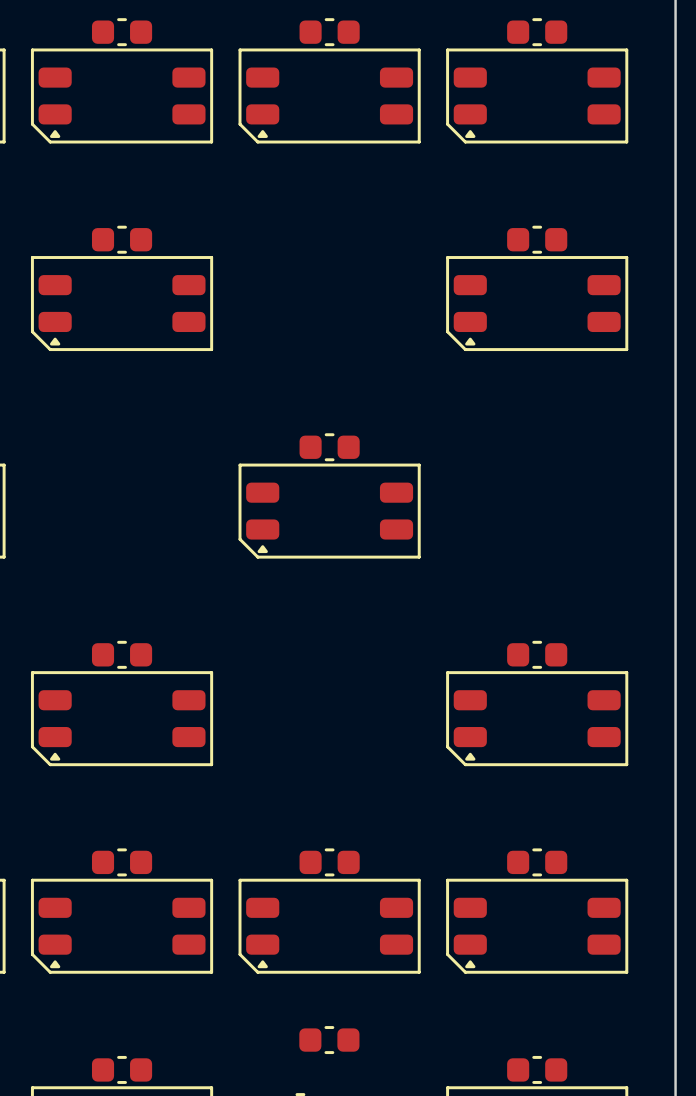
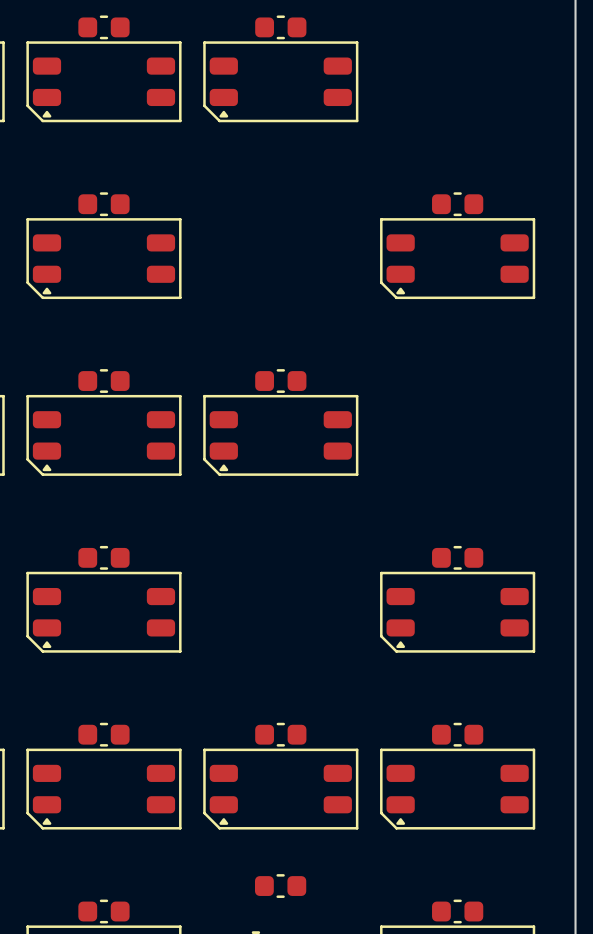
part position: (537, 32) -> (103, 381)
part position: (537, 95) -> (103, 435)

